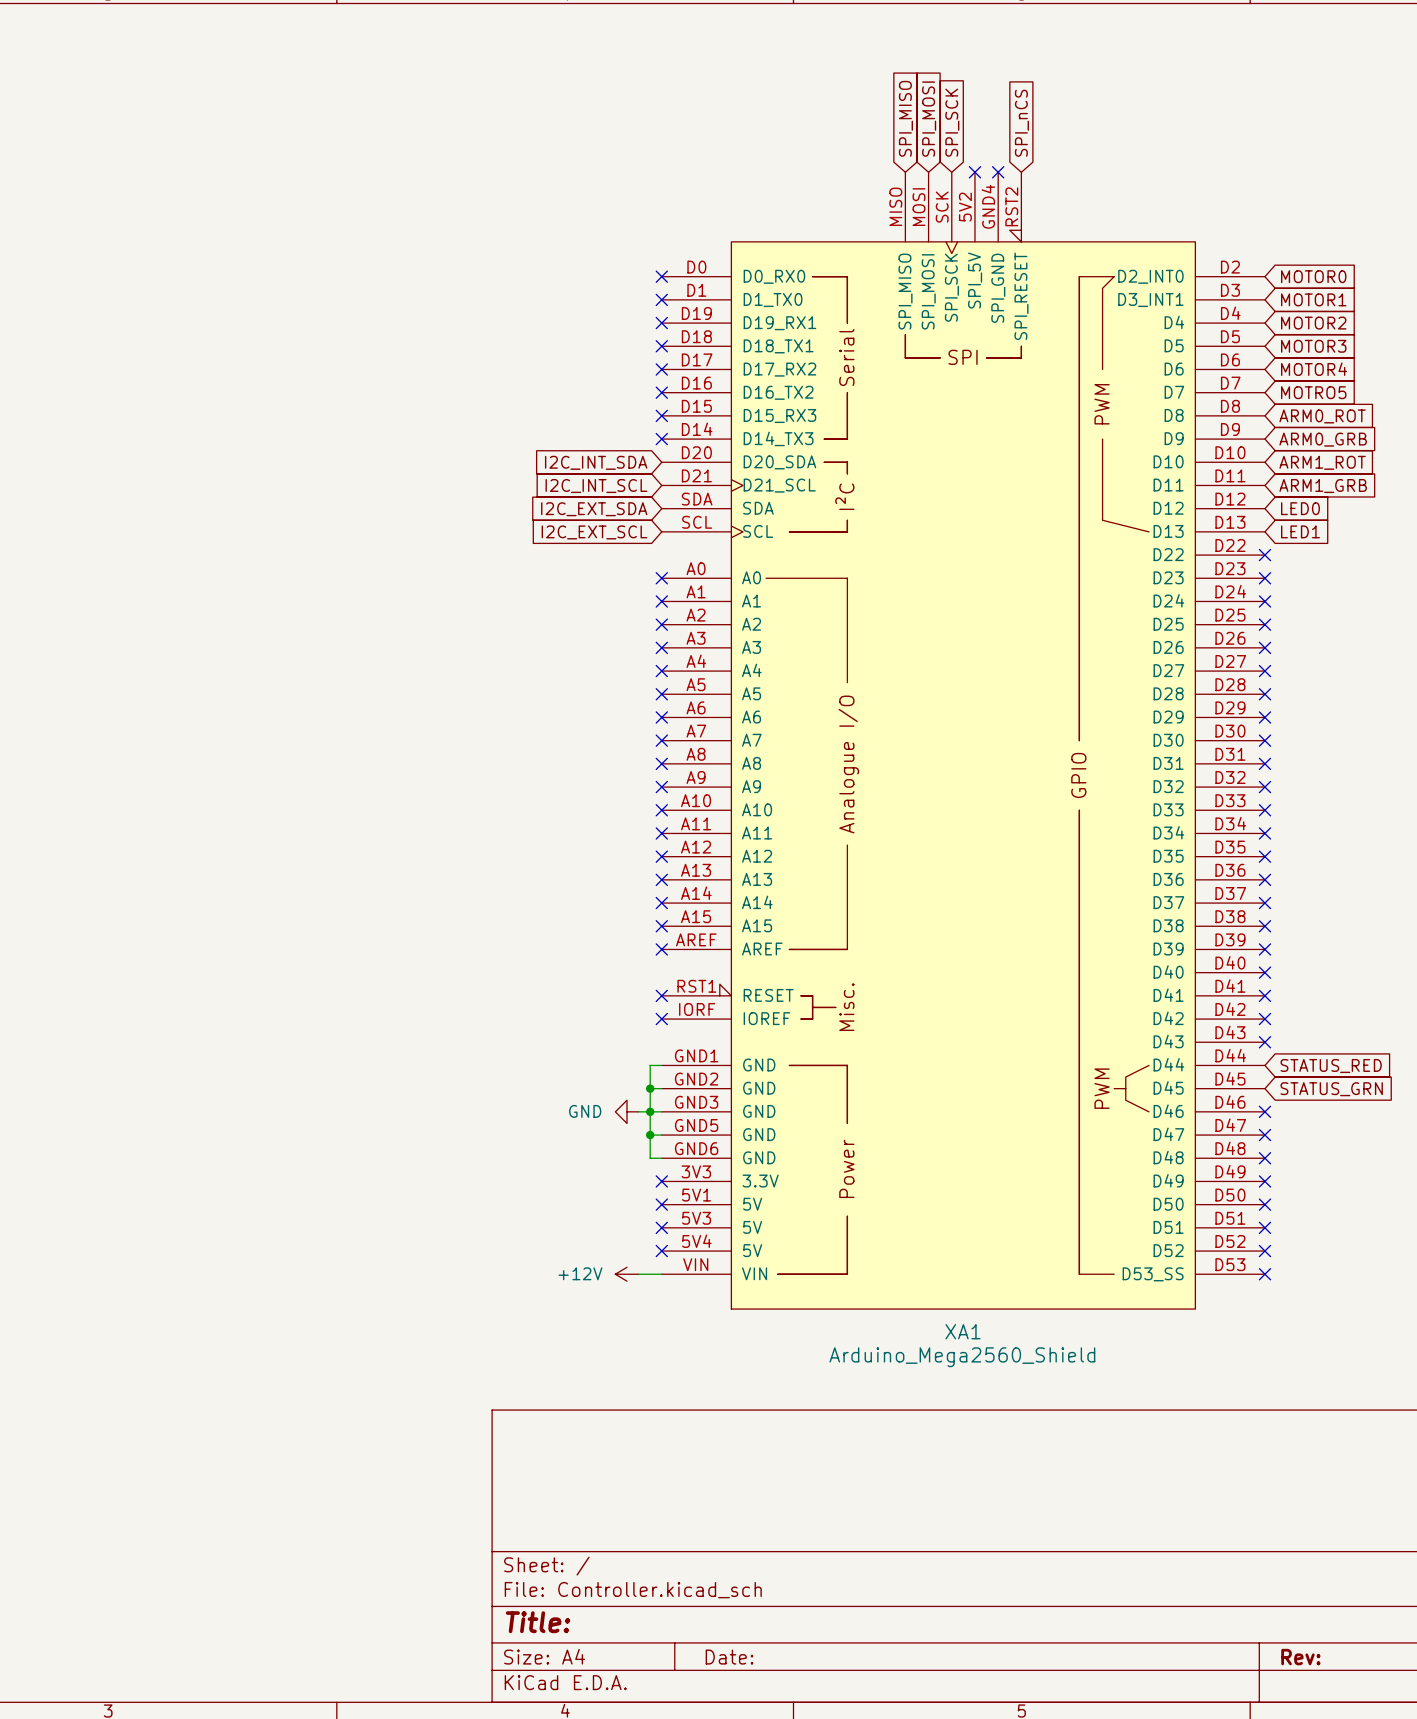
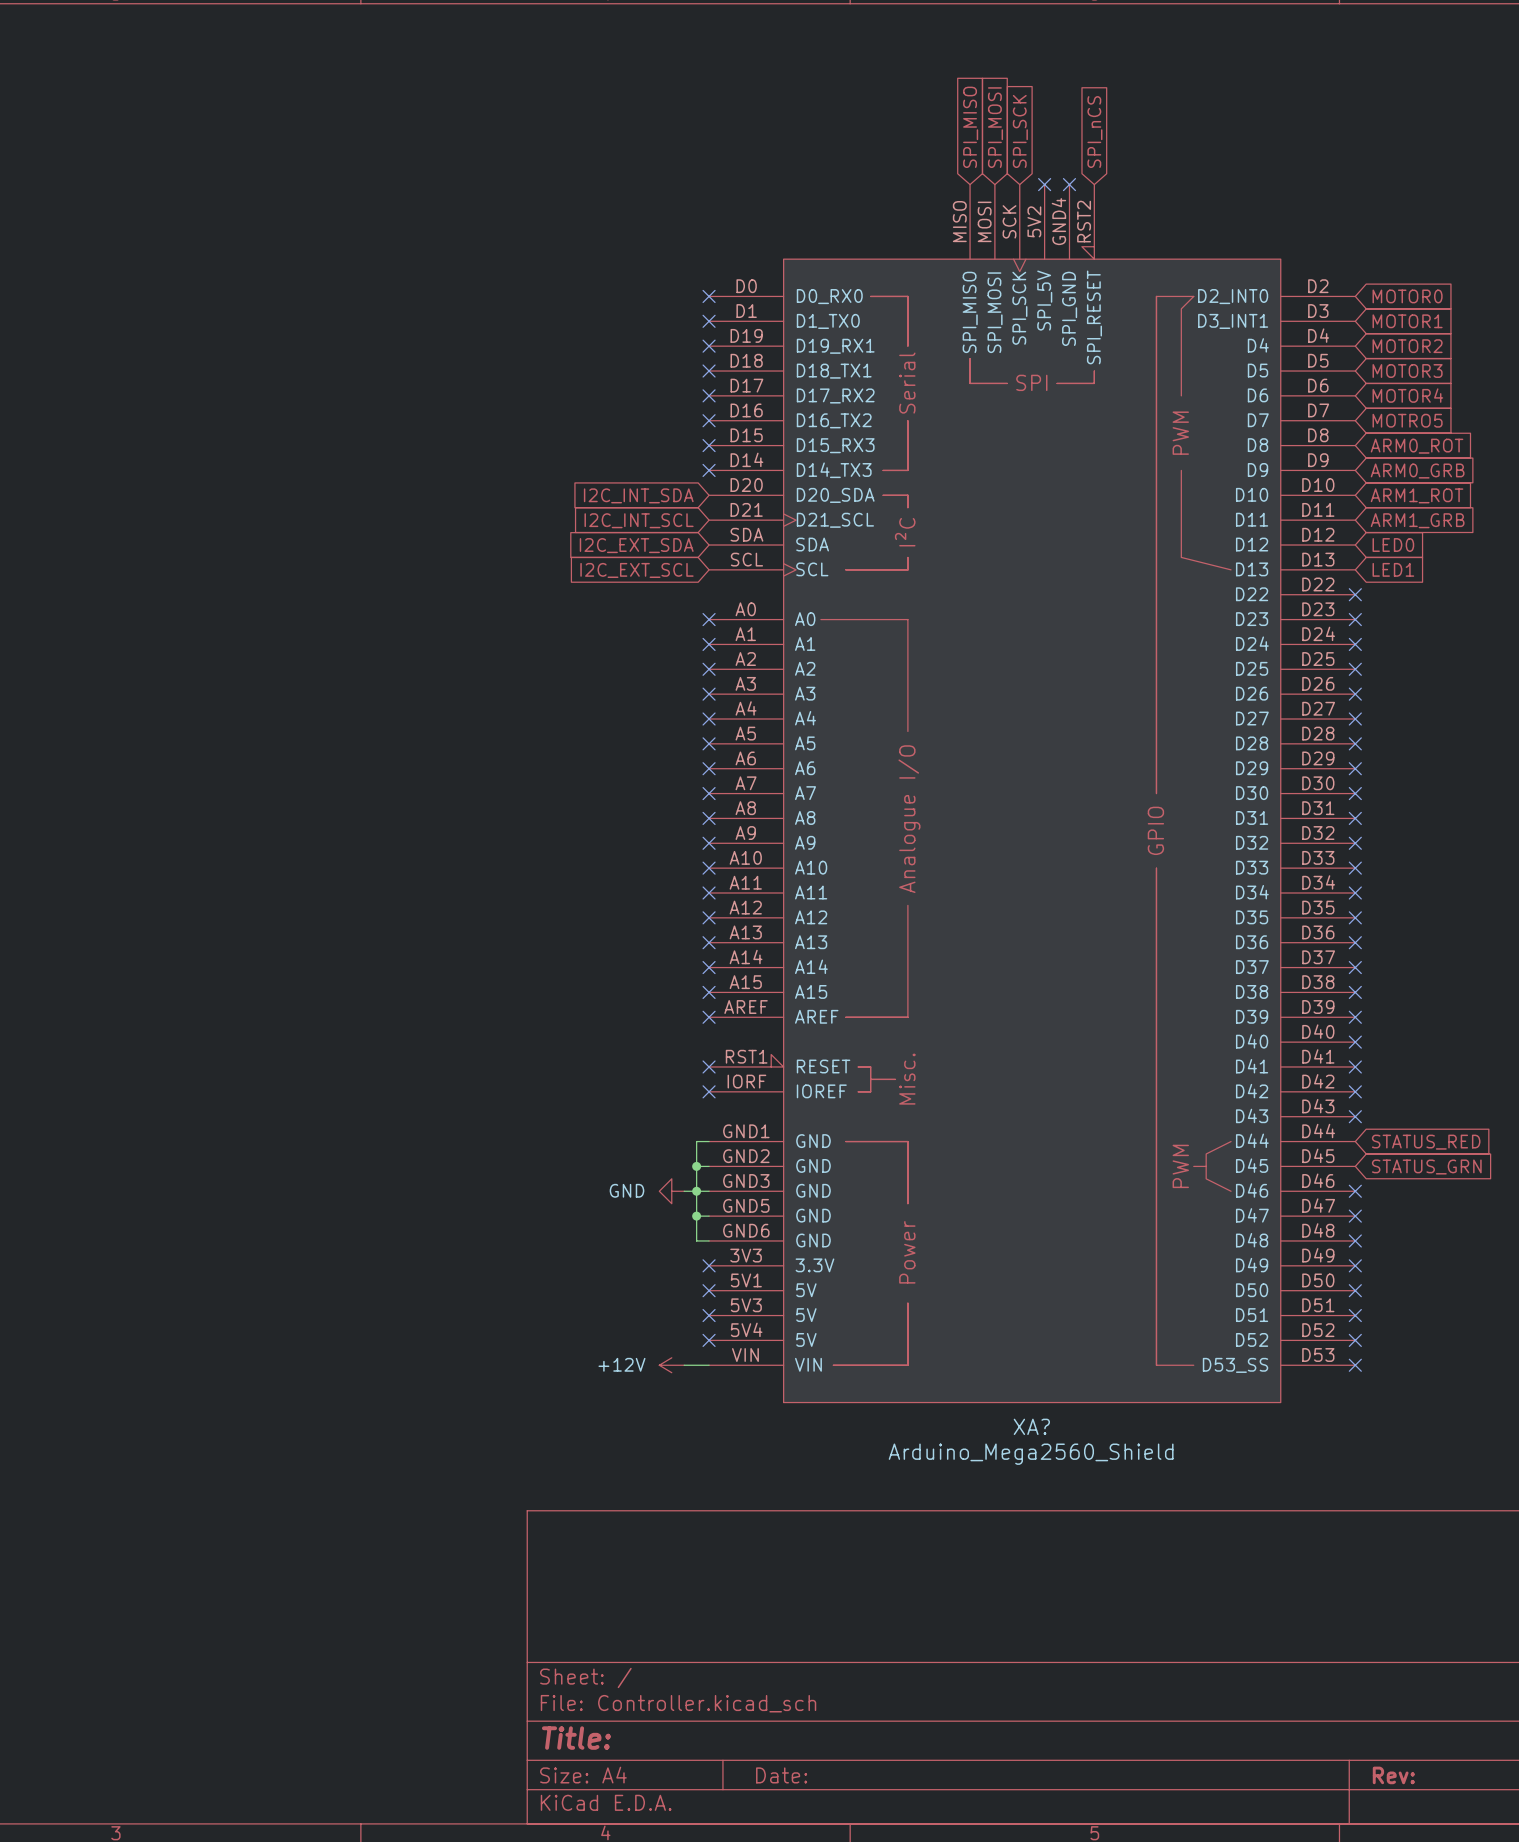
XA1 name: XA1 (963, 1331) -> XA? (1031, 1426)

